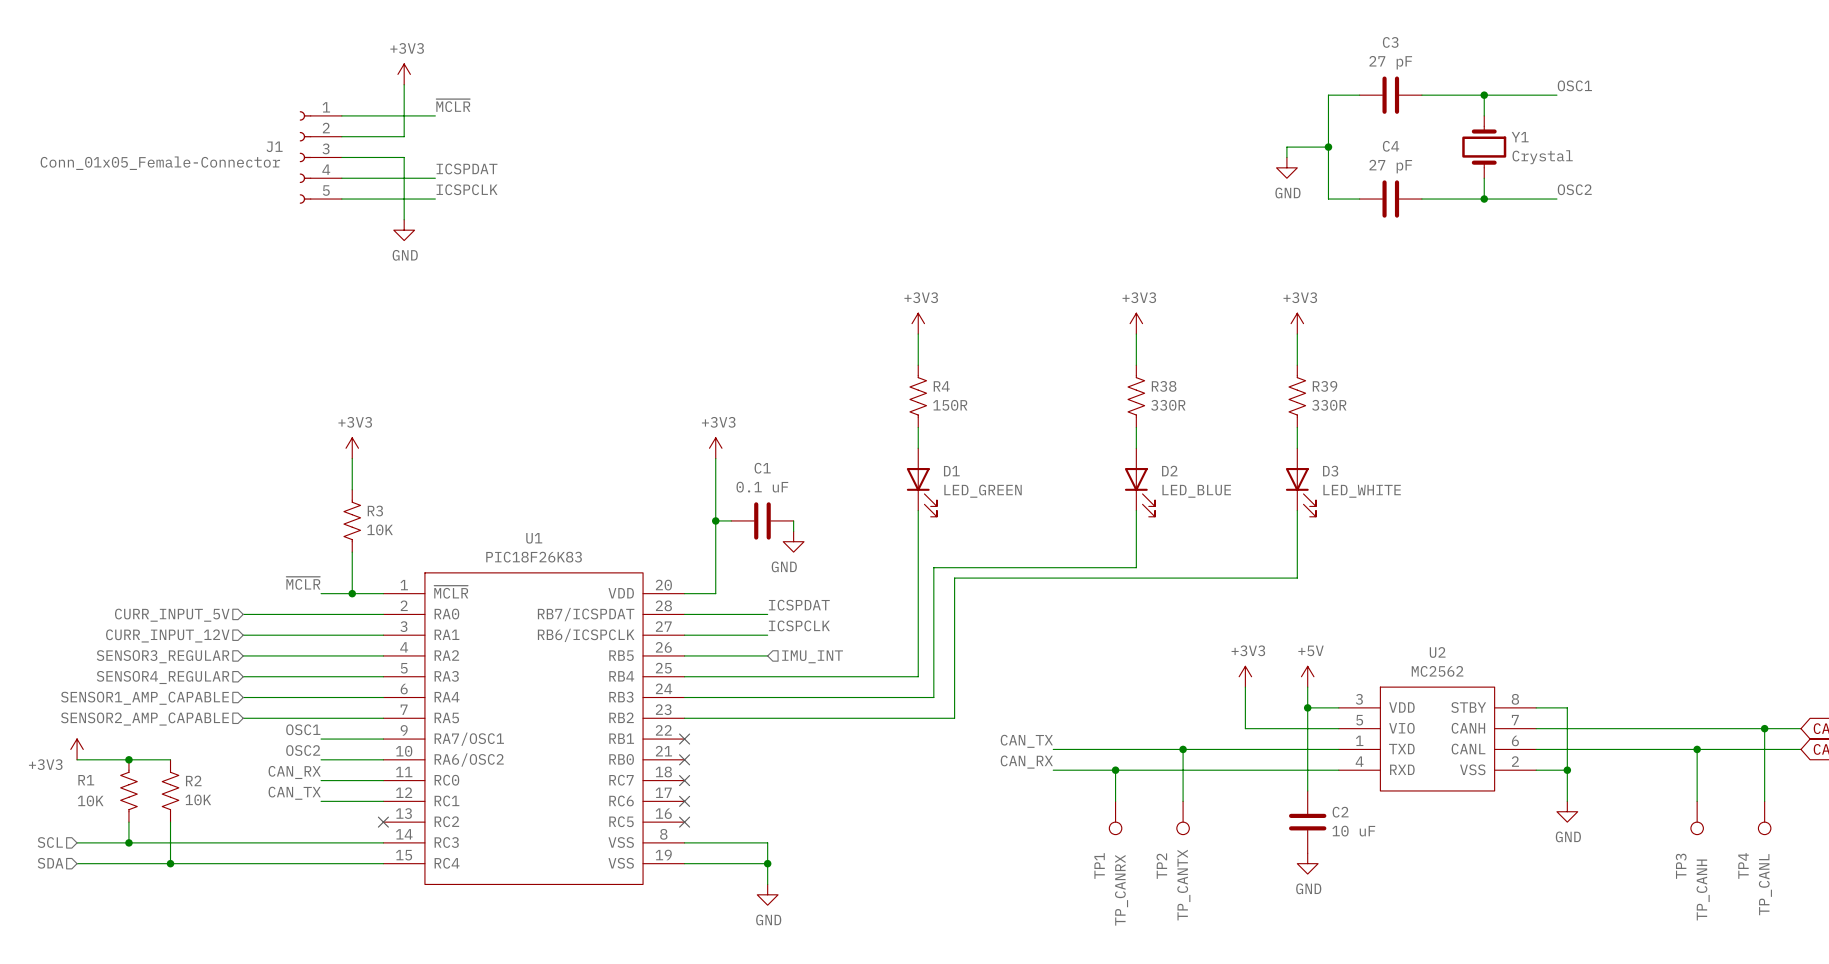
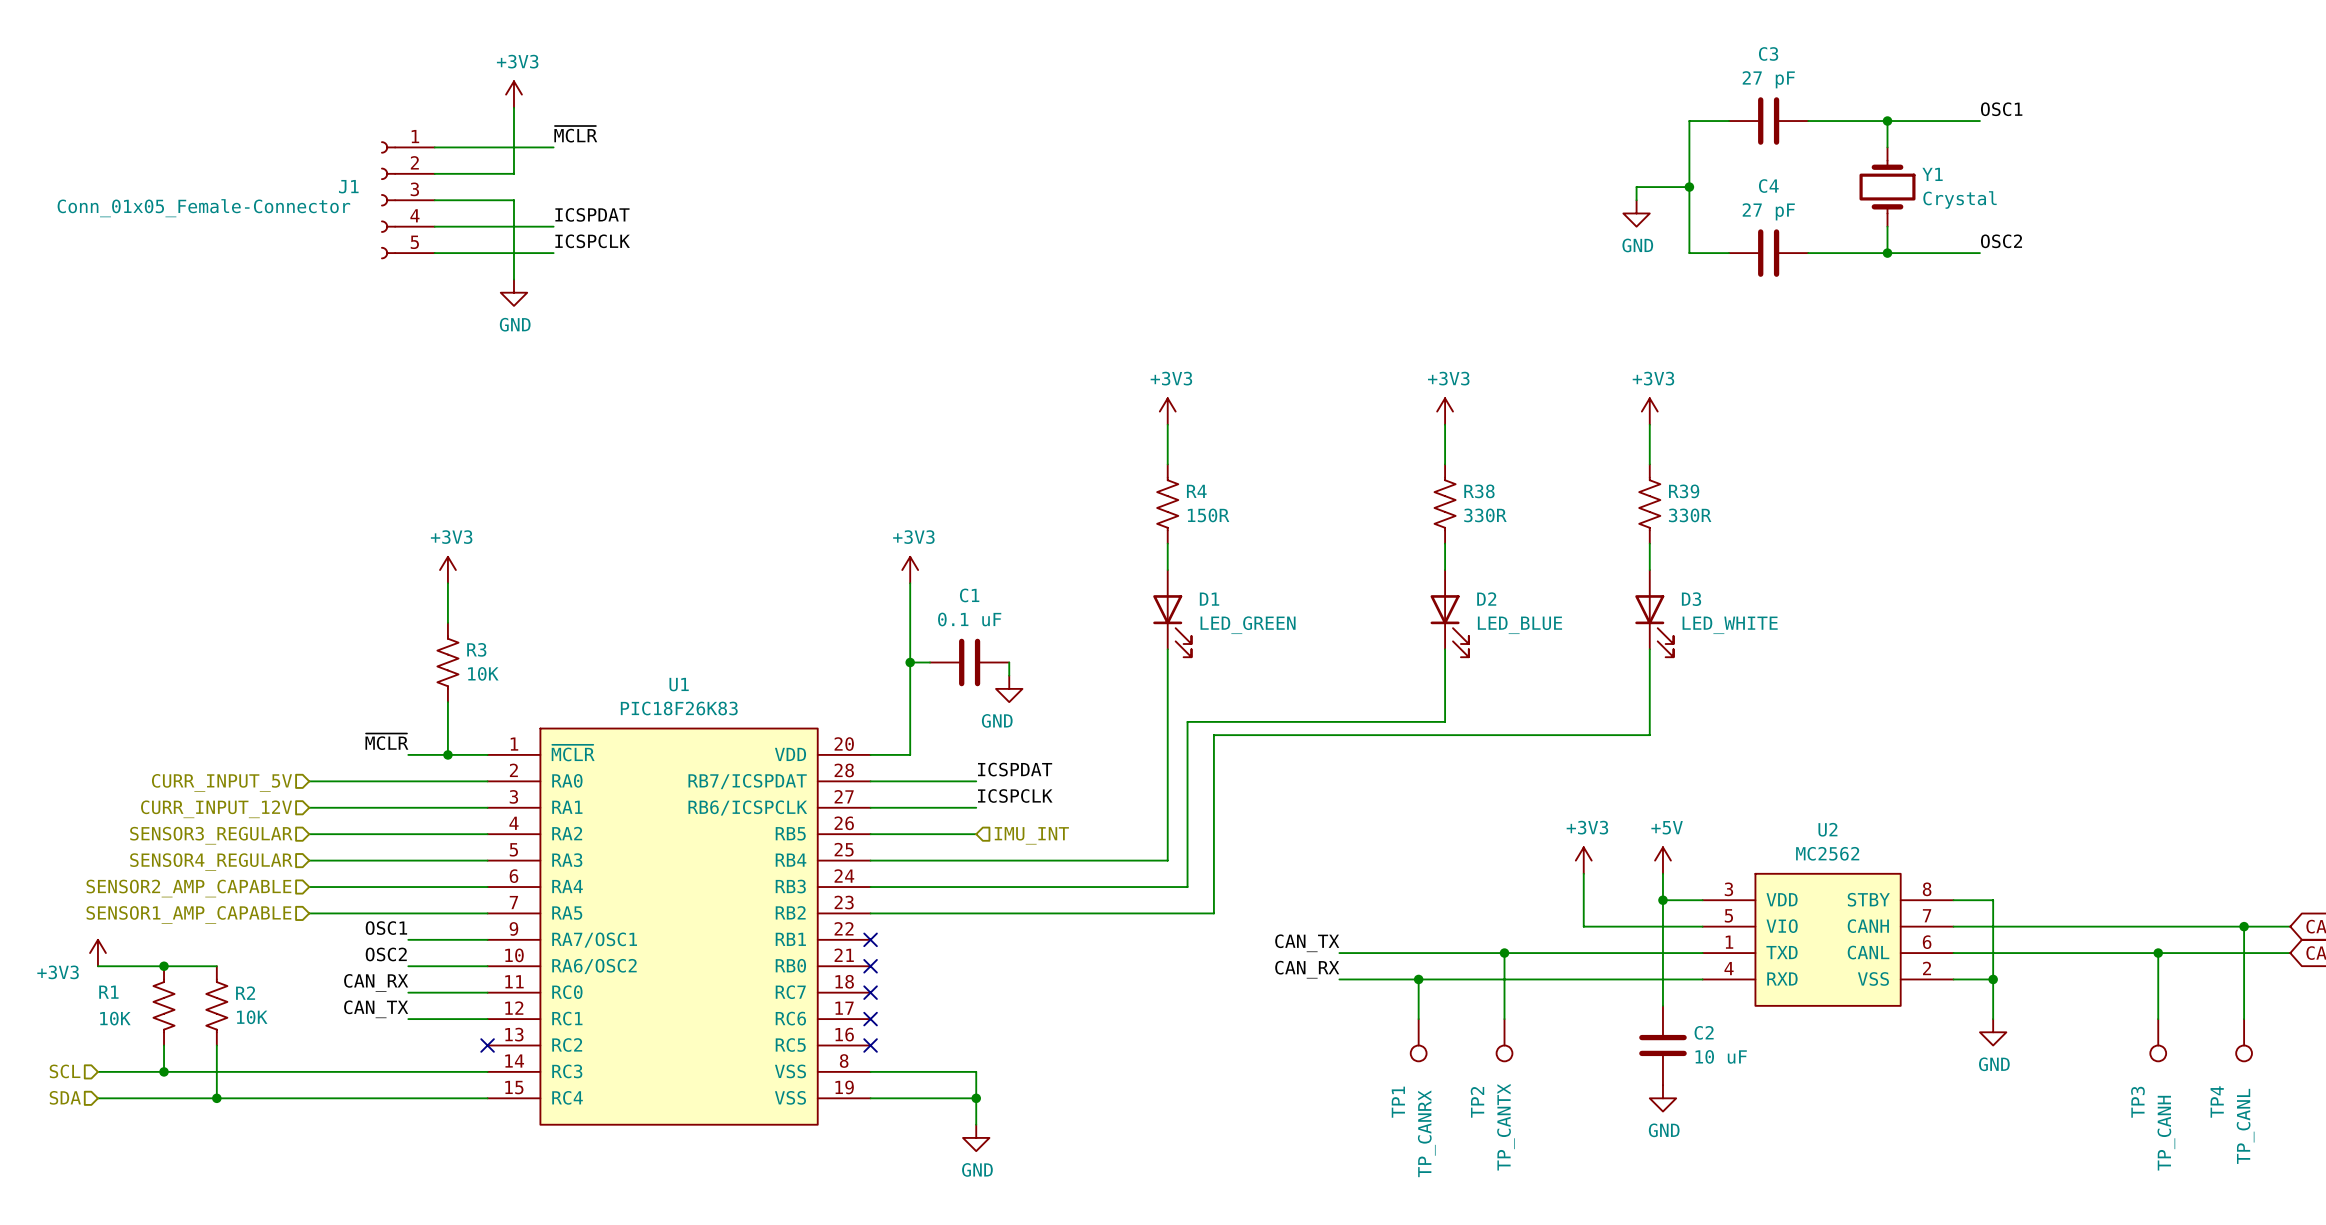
hierarchical label: SENSOR1_AMP_CAPABLE (144, 698) -> SENSOR2_AMP_CAPABLE (188, 888)
hierarchical label: SENSOR2_AMP_CAPABLE (144, 719) -> SENSOR1_AMP_CAPABLE (188, 914)

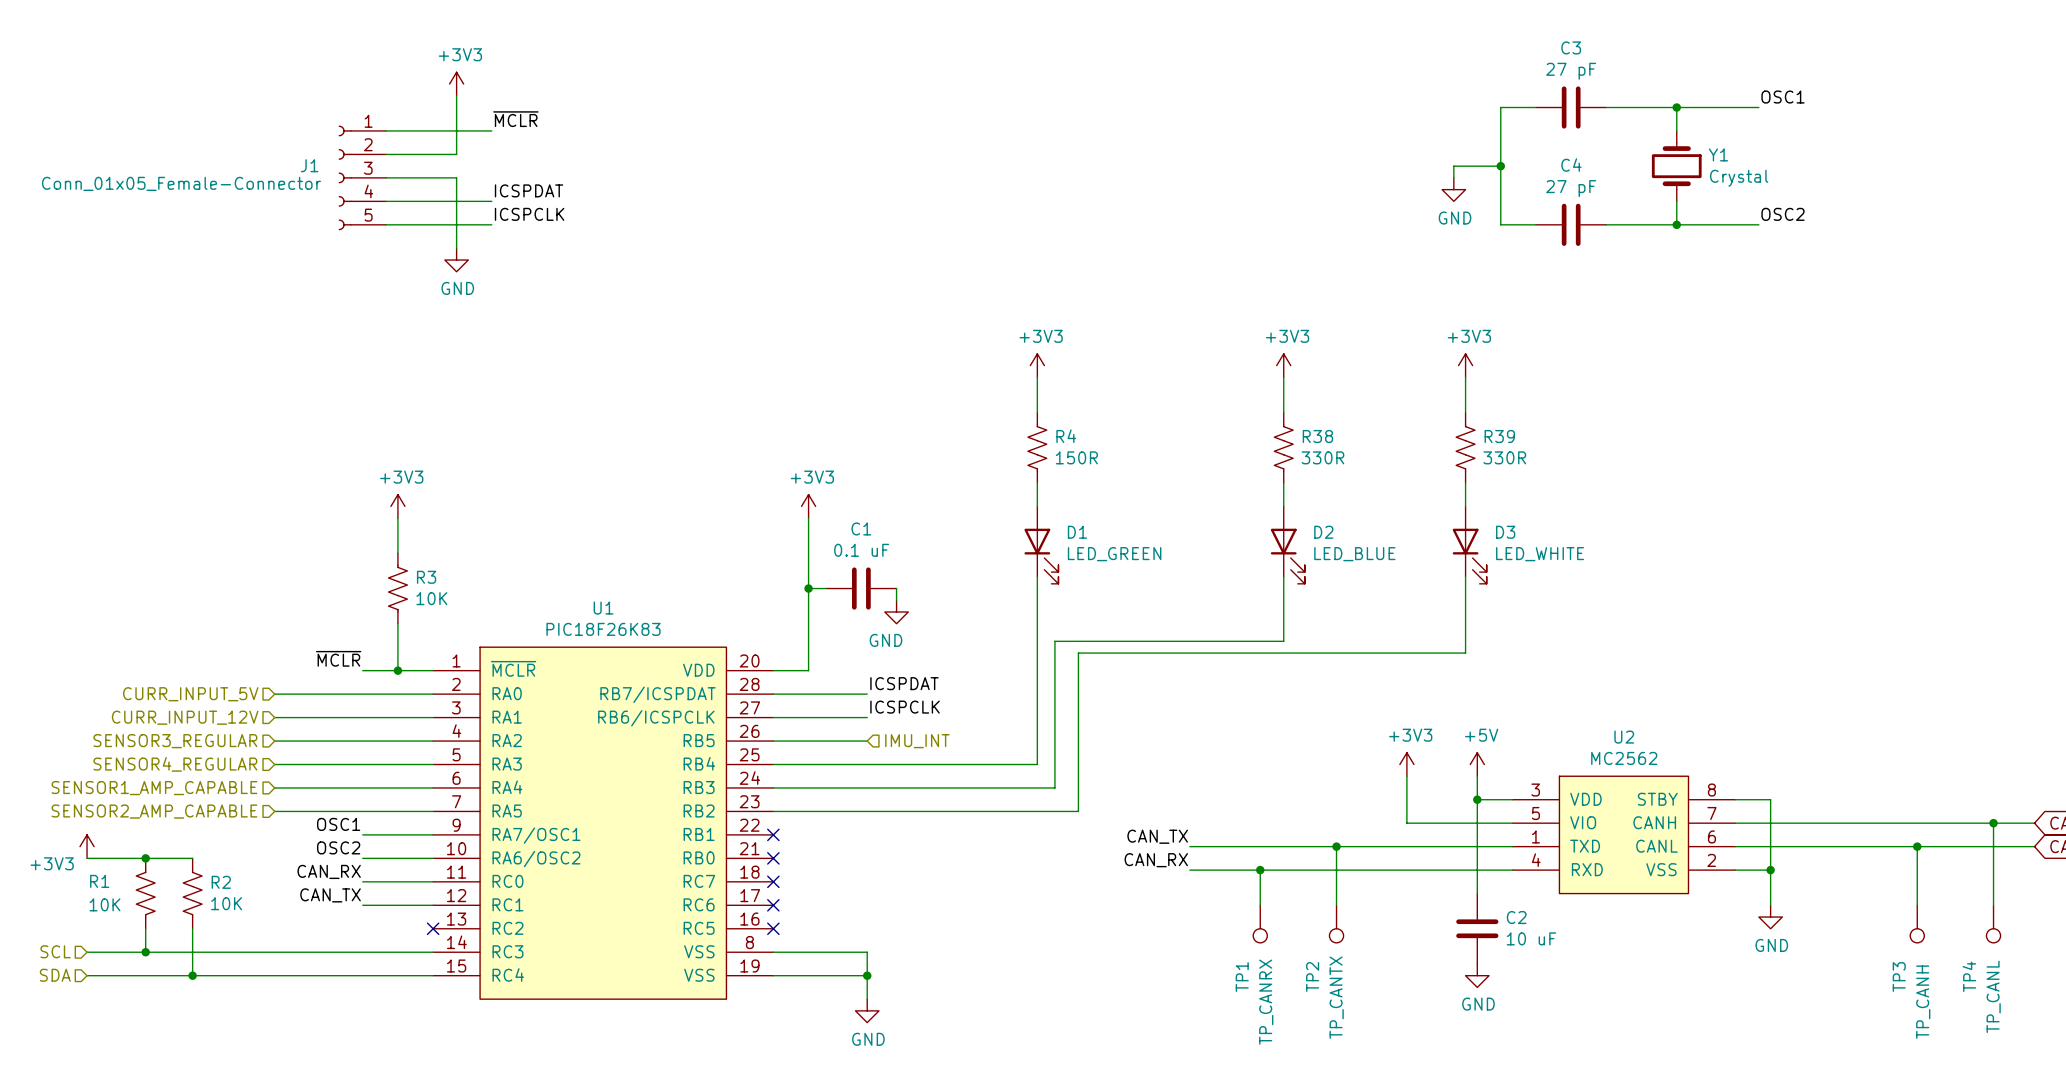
hierarchical label: SENSOR2_AMP_CAPABLE (188, 888) -> SENSOR1_AMP_CAPABLE (154, 788)
hierarchical label: SENSOR1_AMP_CAPABLE (188, 914) -> SENSOR2_AMP_CAPABLE (154, 811)

